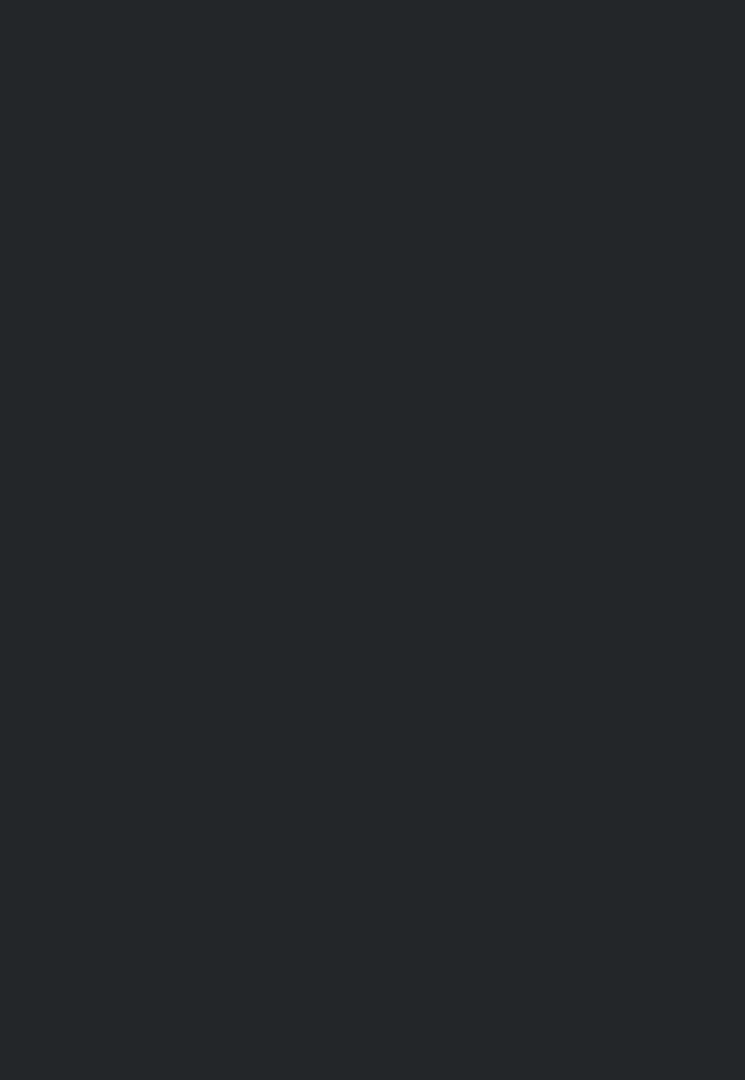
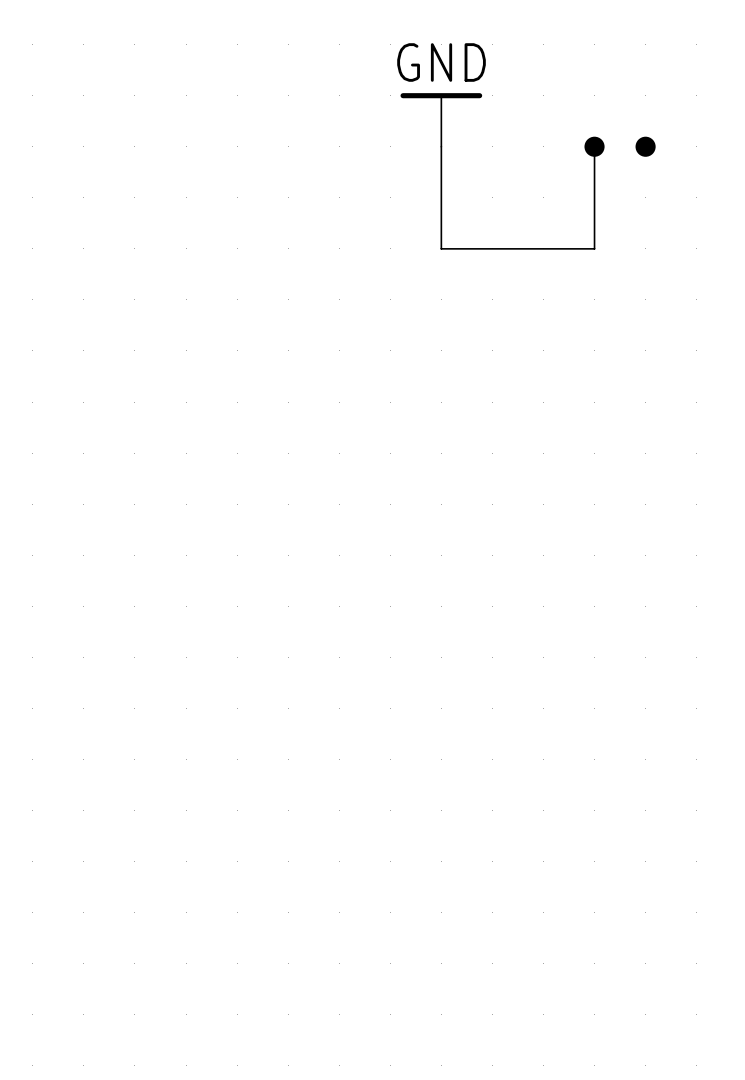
power symbol: none -> GND (441, 119)
wire: none -> (441, 146) (441, 248) (594, 248) (594, 146)
junction: none -> (594, 146)
junction: none -> (645, 146)

